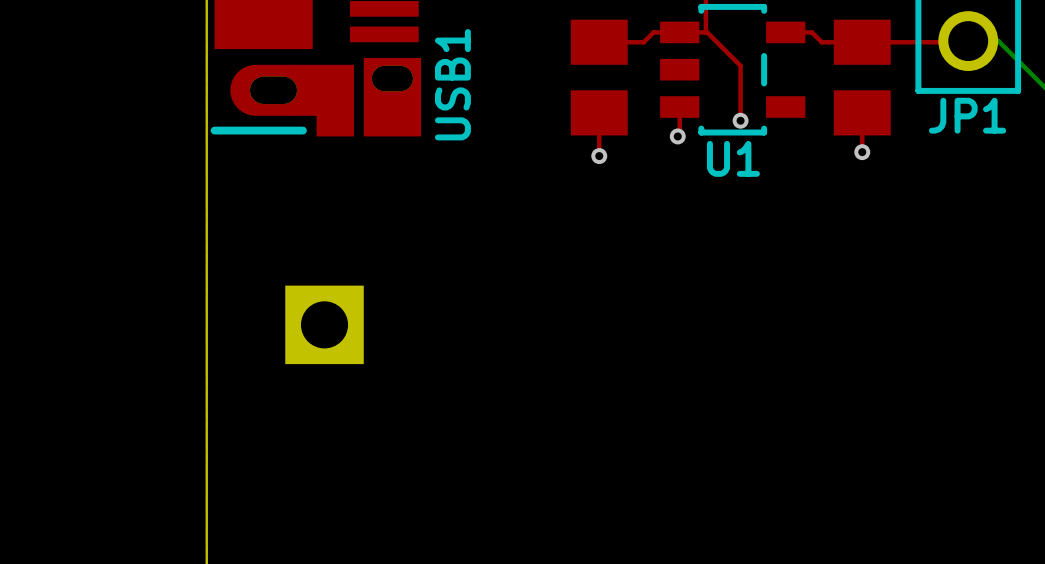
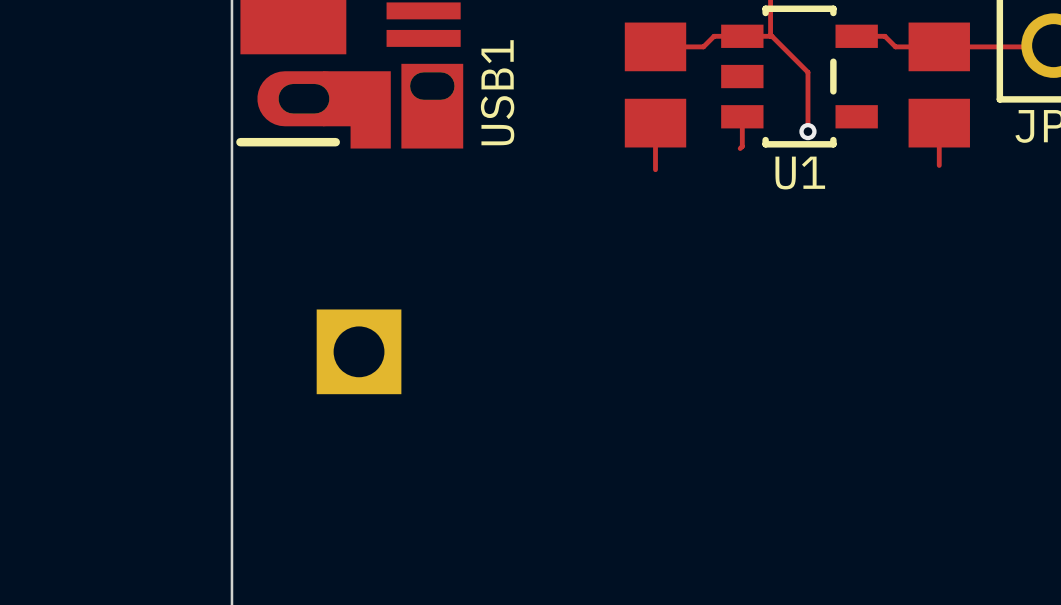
via: (677, 136) -> none
via: (862, 152) -> none
via: (599, 156) -> none

